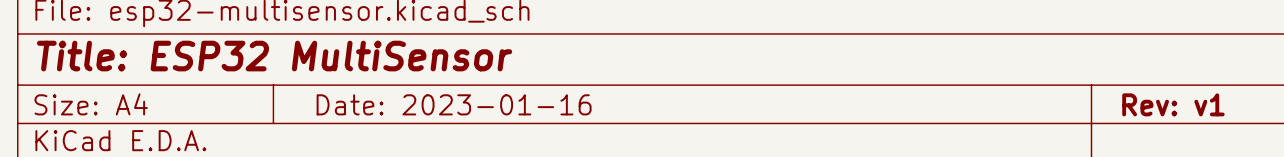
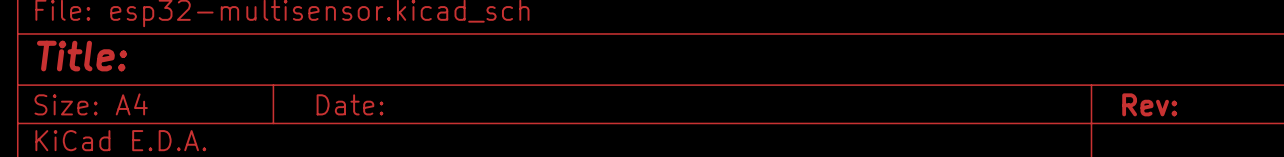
title block: Title: ESP32 MultiSensor (274, 56) -> Title: (82, 56)
title block: Date: 2023-01-16 (454, 104) -> Date: (350, 104)
title block: Rev: v1 (1173, 104) -> Rev: (1149, 104)

